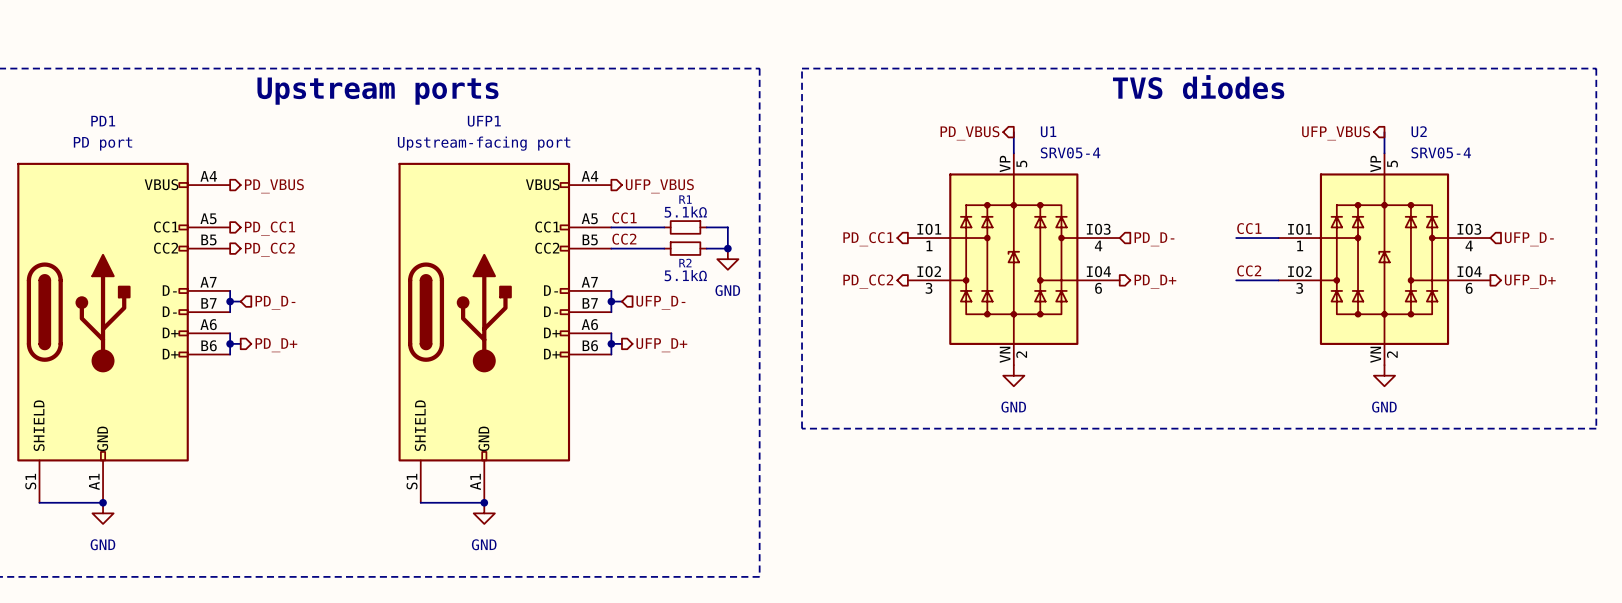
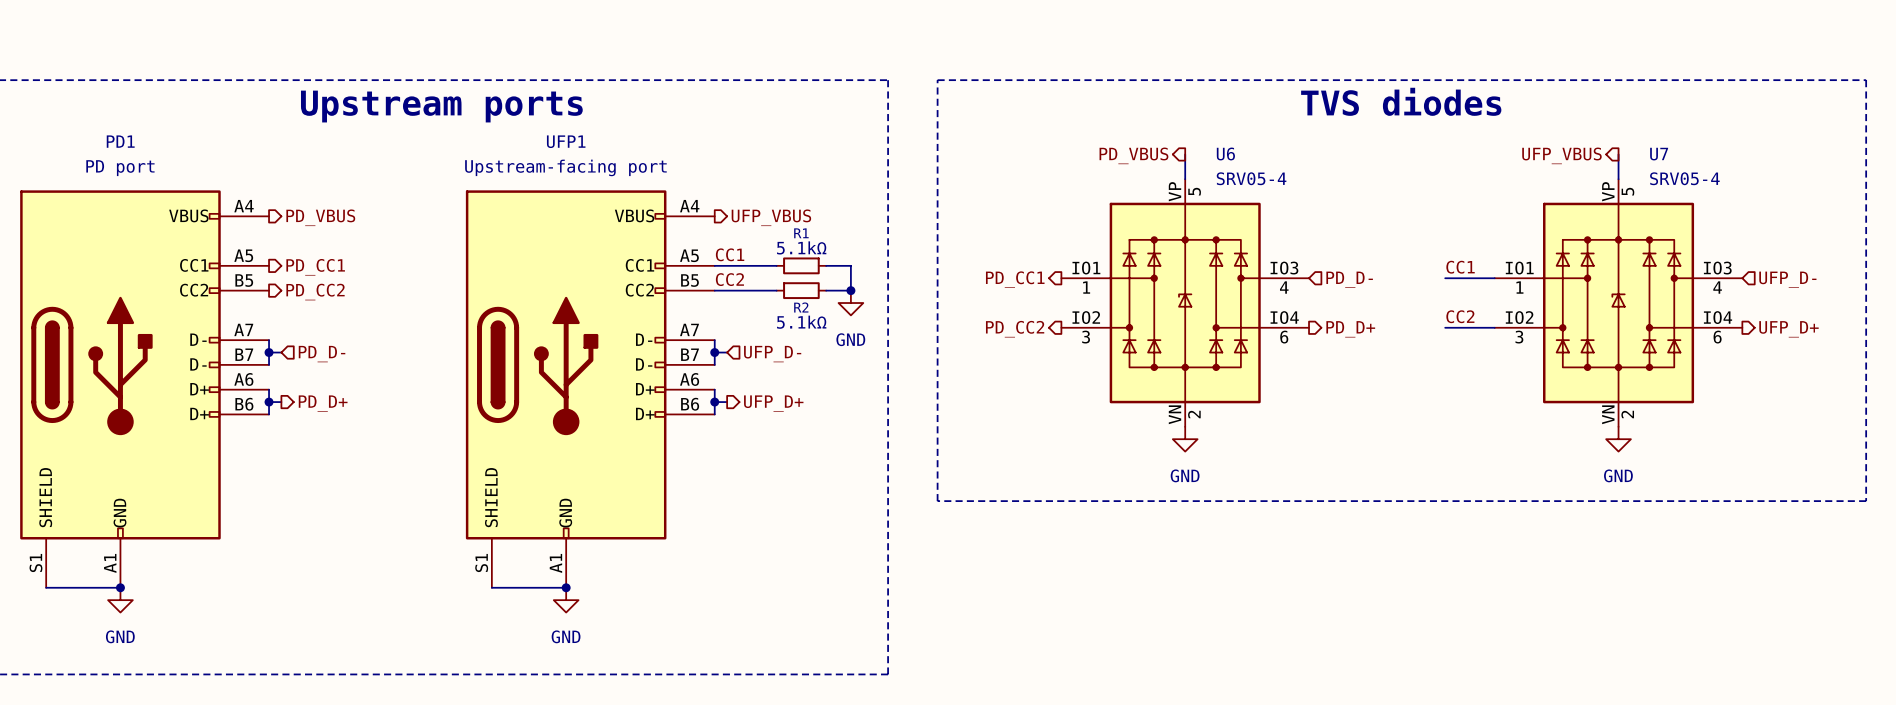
U1 name: U1 (1048, 131) -> U6 (1225, 153)
U2 name: U2 (1419, 131) -> U7 (1659, 154)

